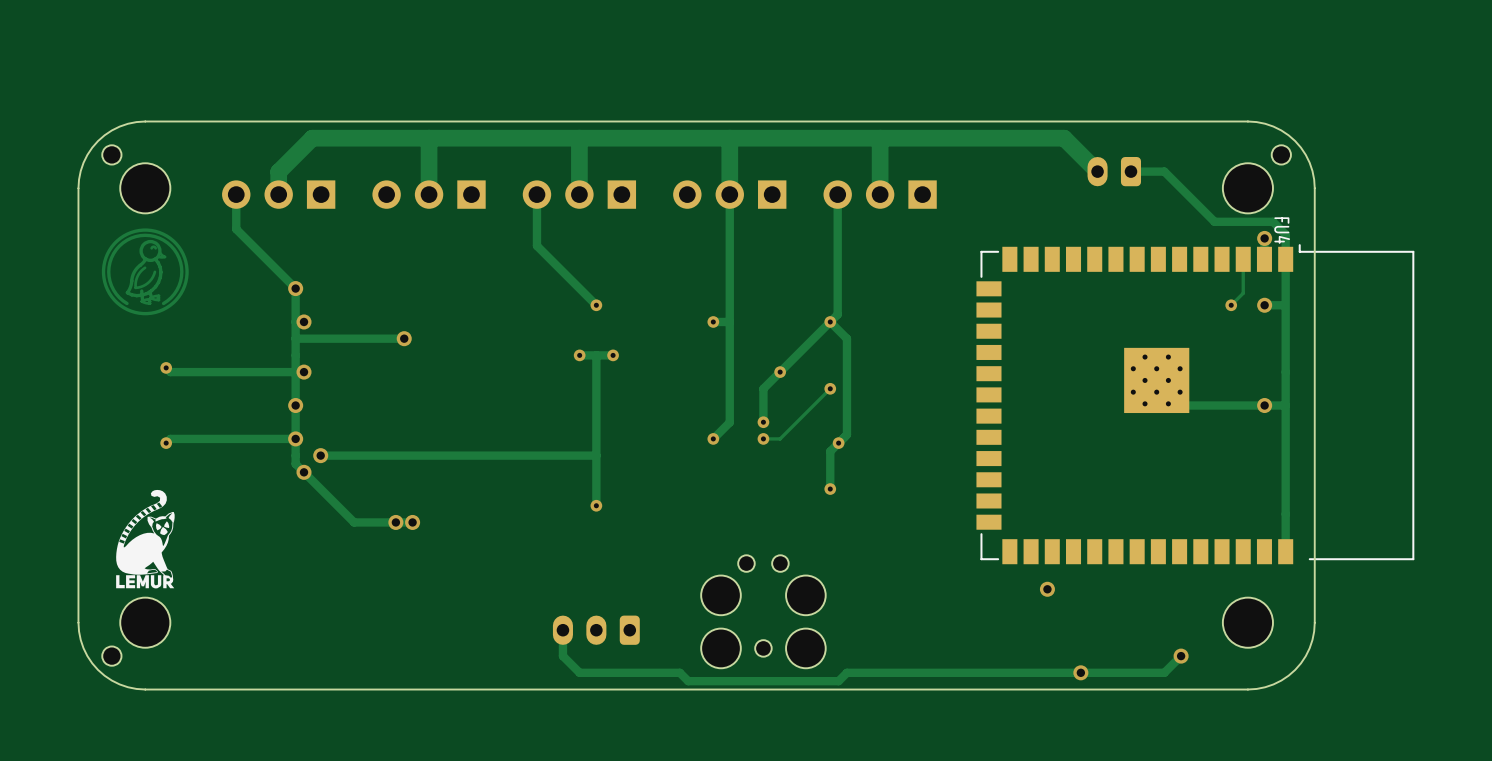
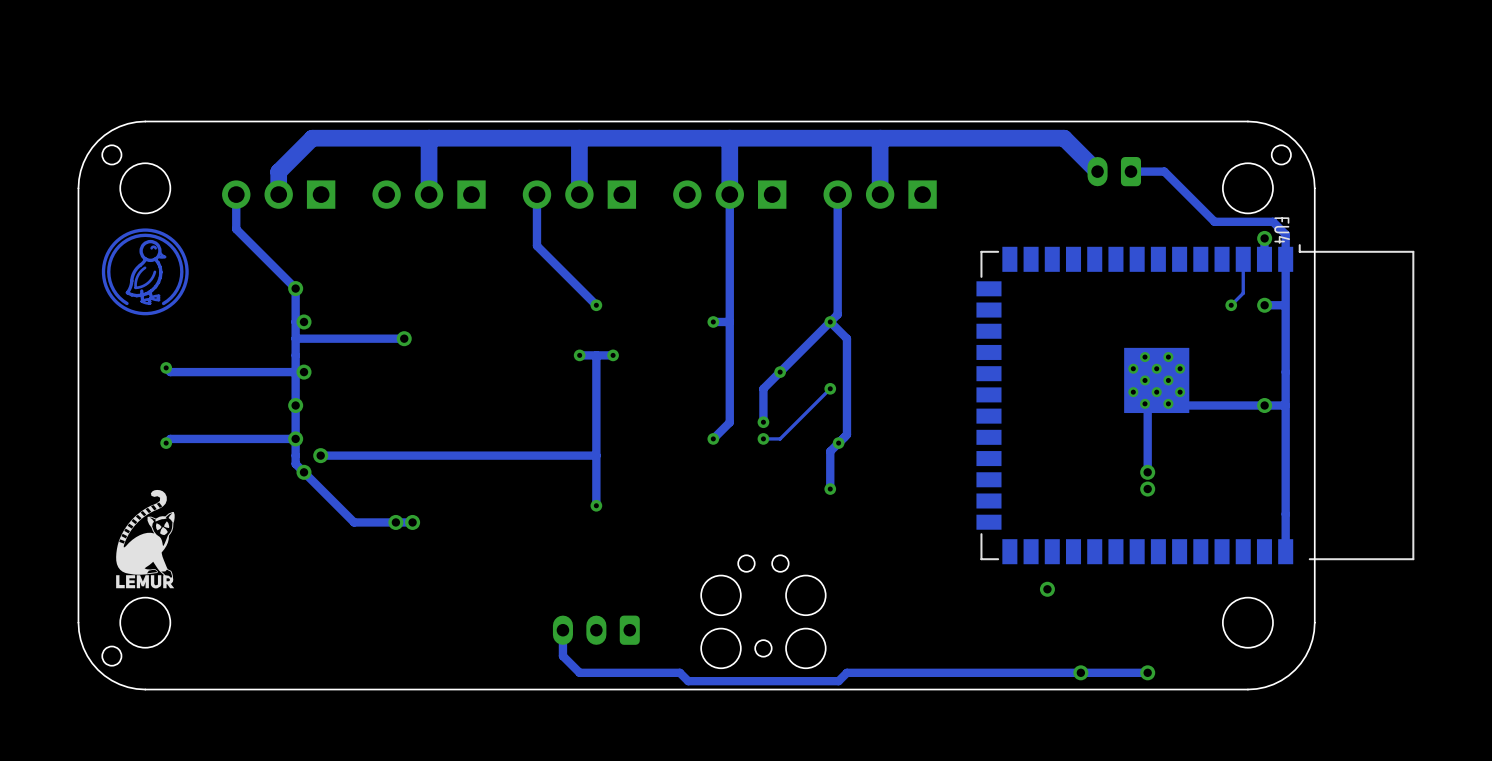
track: none -> (1147, 405) (1147, 472)
via: none -> (1147, 472)
via: none -> (1147, 489)
track: (1181, 656) (1164, 672) (1147, 672) -> none
via position: (1181, 656) -> (1147, 672)

